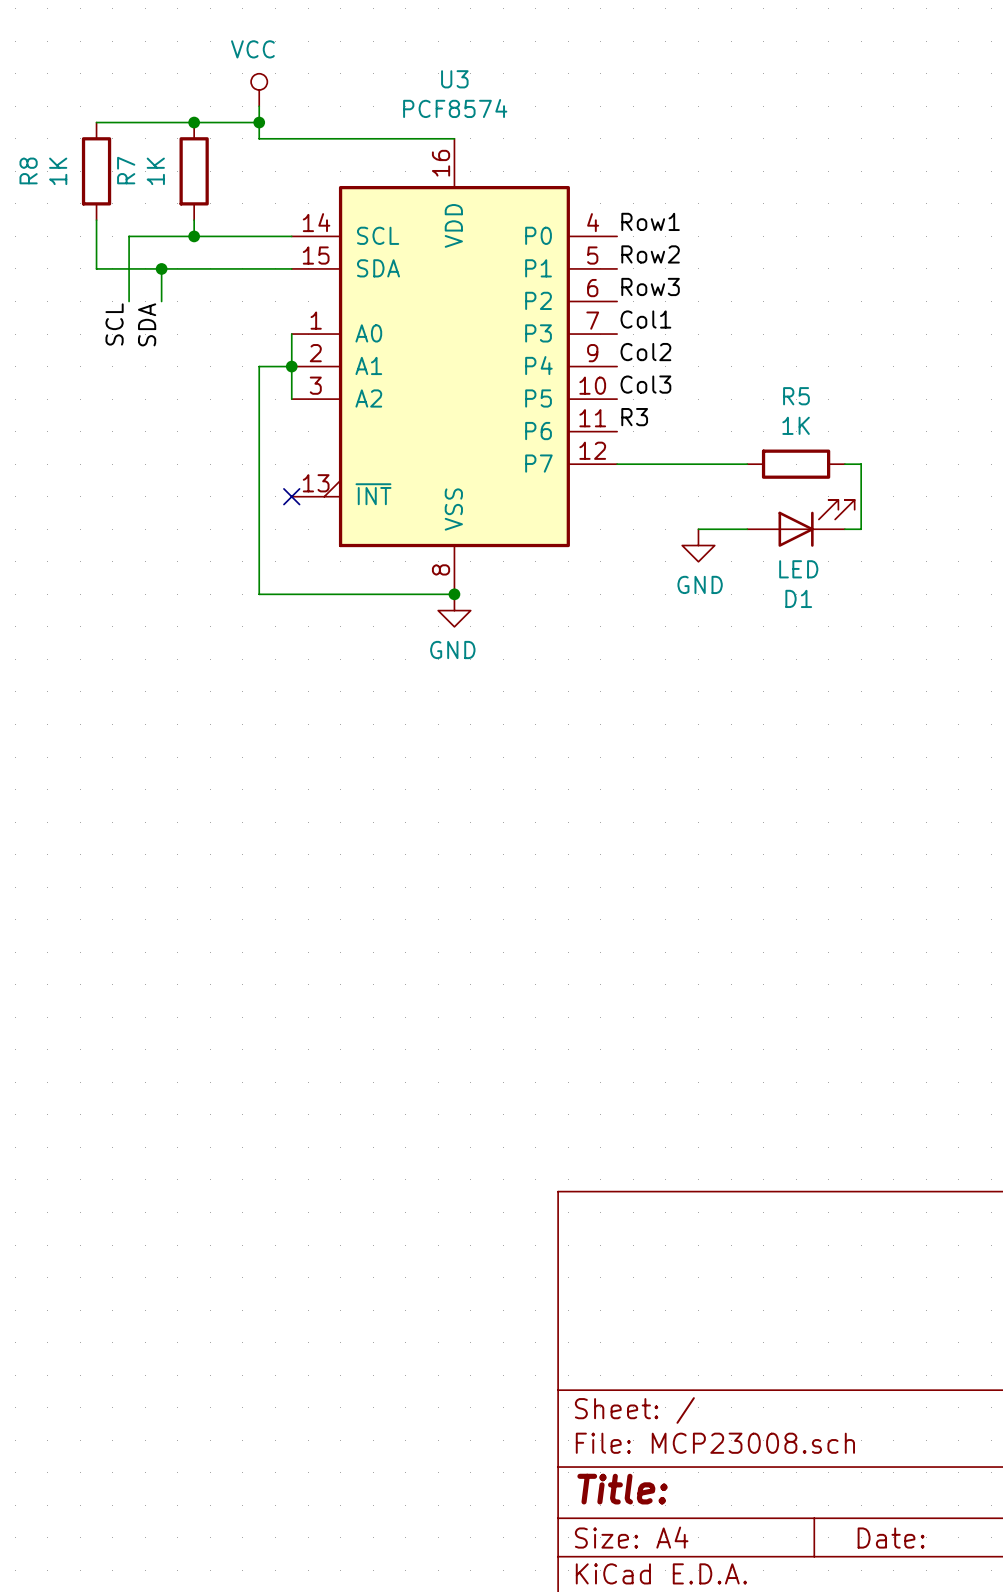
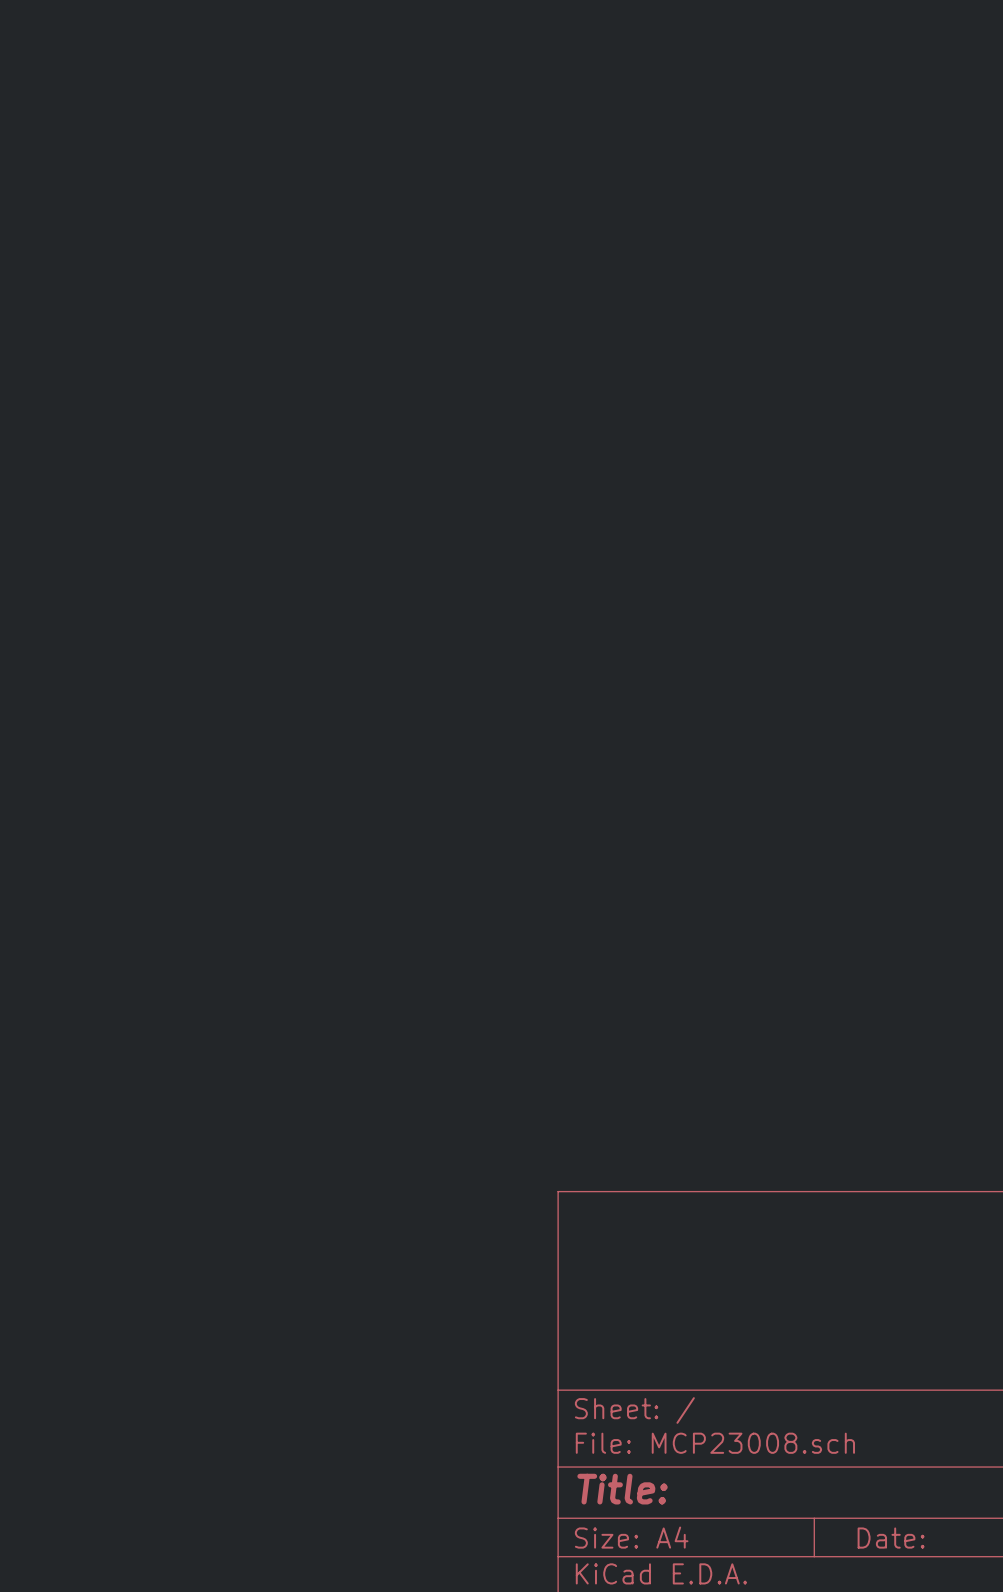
power symbol: VCC (259, 90) -> none
wire: (259, 106) (259, 138) (454, 138) -> none
wire: (96, 122) (259, 122) -> none
junction: (194, 122) -> none
junction: (259, 122) -> none
R8: 1K (96, 171) -> none
R7: 1K (194, 171) -> none
wire: (96, 220) (96, 268) (291, 268) -> none
wire: (194, 220) (194, 236) -> none
label: Row1 (650, 221) -> none
junction: (194, 236) -> none
wire: (291, 236) (129, 236) (129, 301) -> none
label: Row2 (650, 254) -> none
wire: (161, 268) (161, 301) -> none
junction: (161, 268) -> none
label: Row3 (650, 286) -> none
label: Col1 (645, 319) -> none
label: SCL (114, 324) -> none
label: SDA (147, 324) -> none
wire: (291, 334) (291, 399) -> none
label: Col2 (645, 352) -> none
wire: (291, 366) (259, 366) (259, 594) (454, 594) -> none
junction: (291, 366) -> none
U3: PCF8574 (454, 366) -> none
label: Col3 (645, 384) -> none
label: R3 (634, 417) -> none
wire: (617, 464) (747, 464) -> none
R5: 1K (796, 464) -> none
wire: (844, 464) (861, 464) (861, 529) (844, 529) -> none
no-connect mark: (291, 496) -> none
D1: LED (800, 523) -> none
wire: (698, 529) (747, 529) -> none
power symbol: GND (698, 545) -> none
junction: (454, 594) -> none
power symbol: GND (454, 610) -> none

